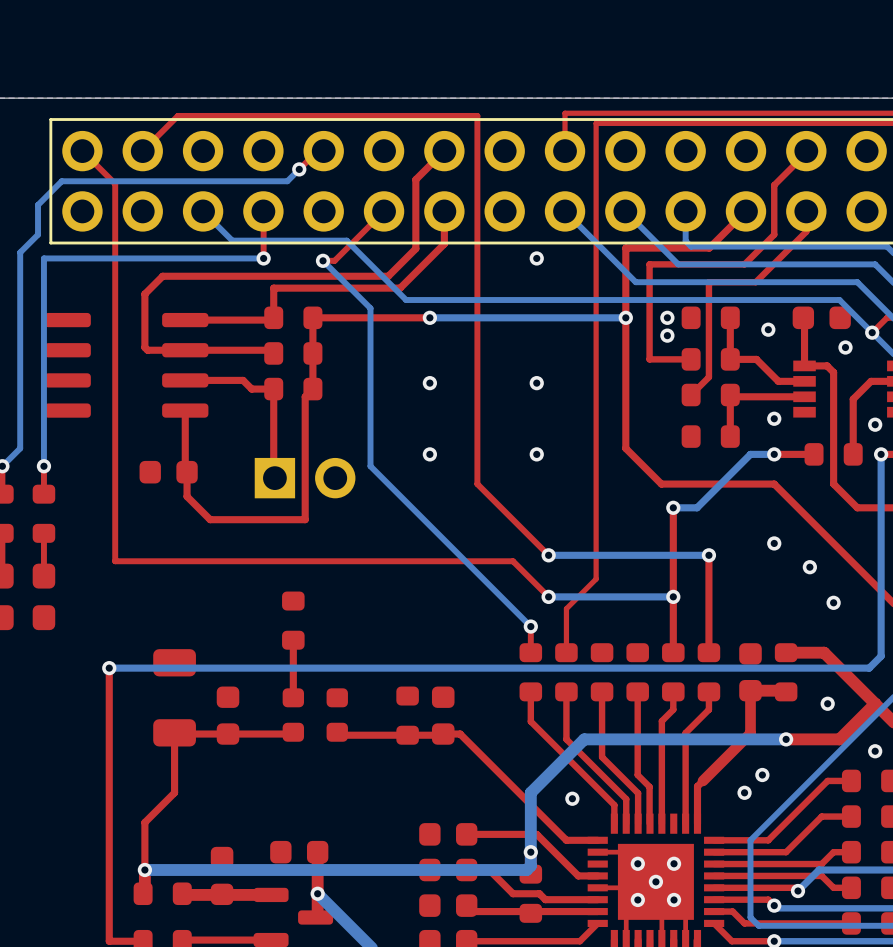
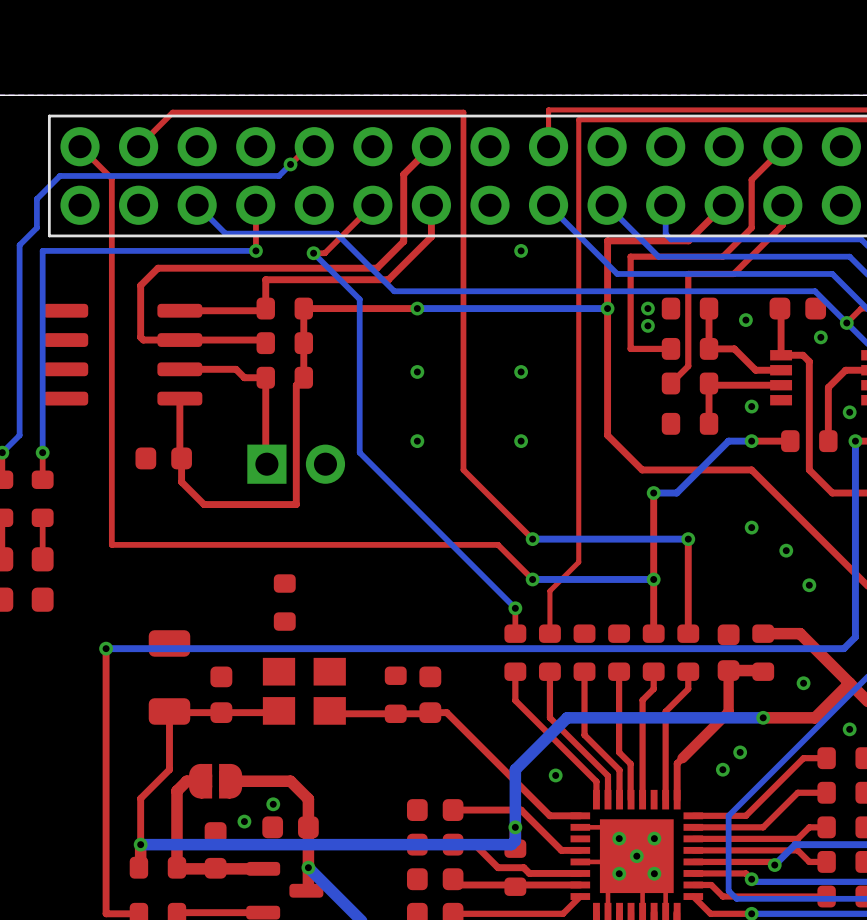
top track: (293, 640) (293, 697) -> none
part footprint: [282, 688, 348, 742] -> [262, 657, 346, 725]
top track: none -> (200, 781) (186, 781) (176, 791) (176, 867)
part: none -> (215, 781)
top track: none -> (230, 781) (290, 781) (308, 799) (308, 827)
via: none -> (273, 804)
via: none -> (244, 821)

